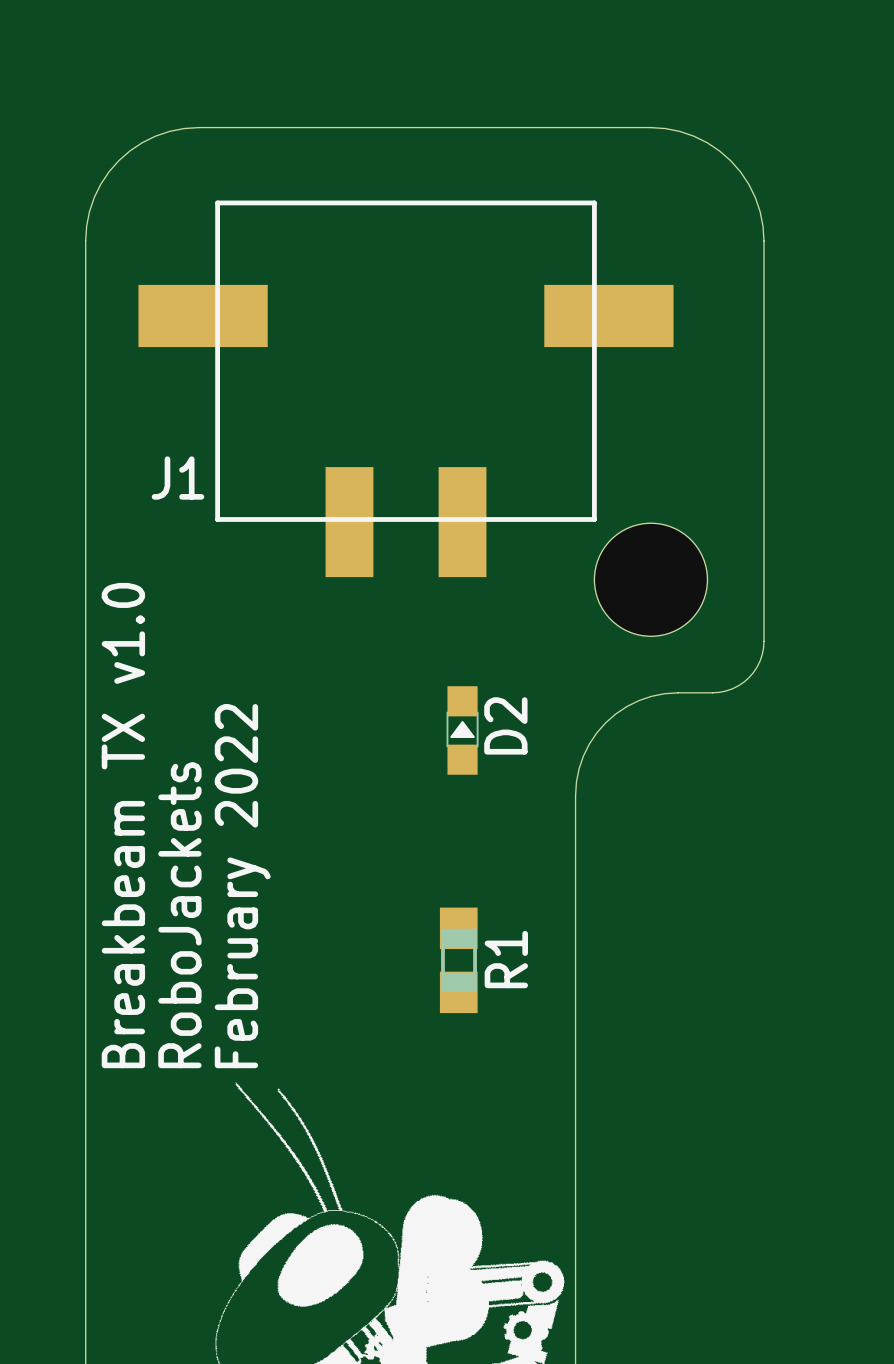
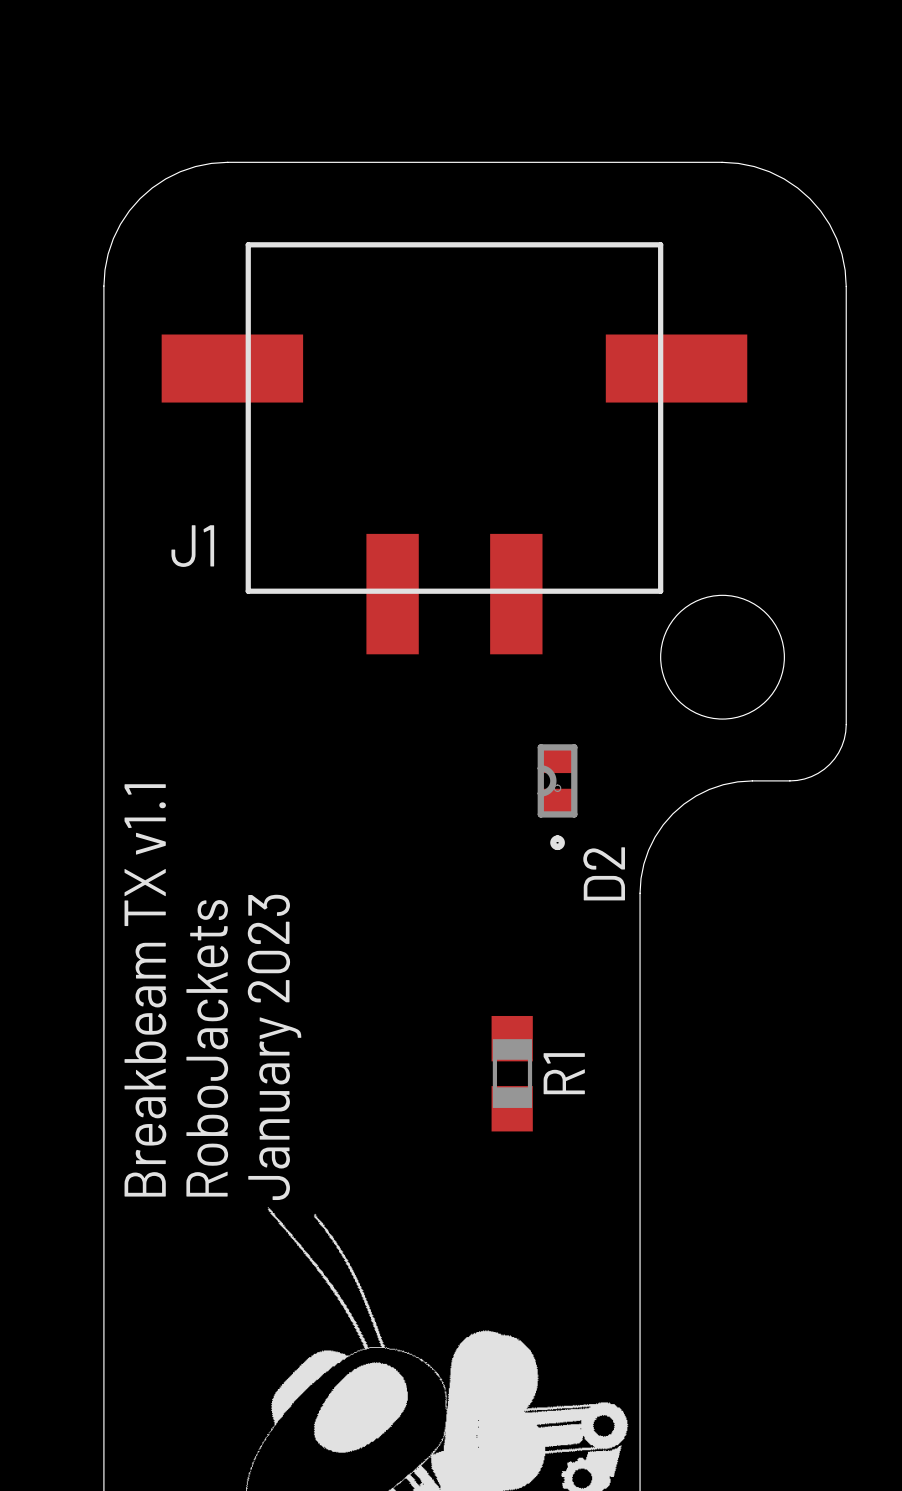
D2 footprint: [446, 686, 479, 775] -> [537, 744, 578, 851]
text: Breakbeam TX v1.0 (123, 825) -> Breakbeam TX v1.1 (145, 990)
text: February 2022 (242, 886) -> January 2023 (274, 1047)

